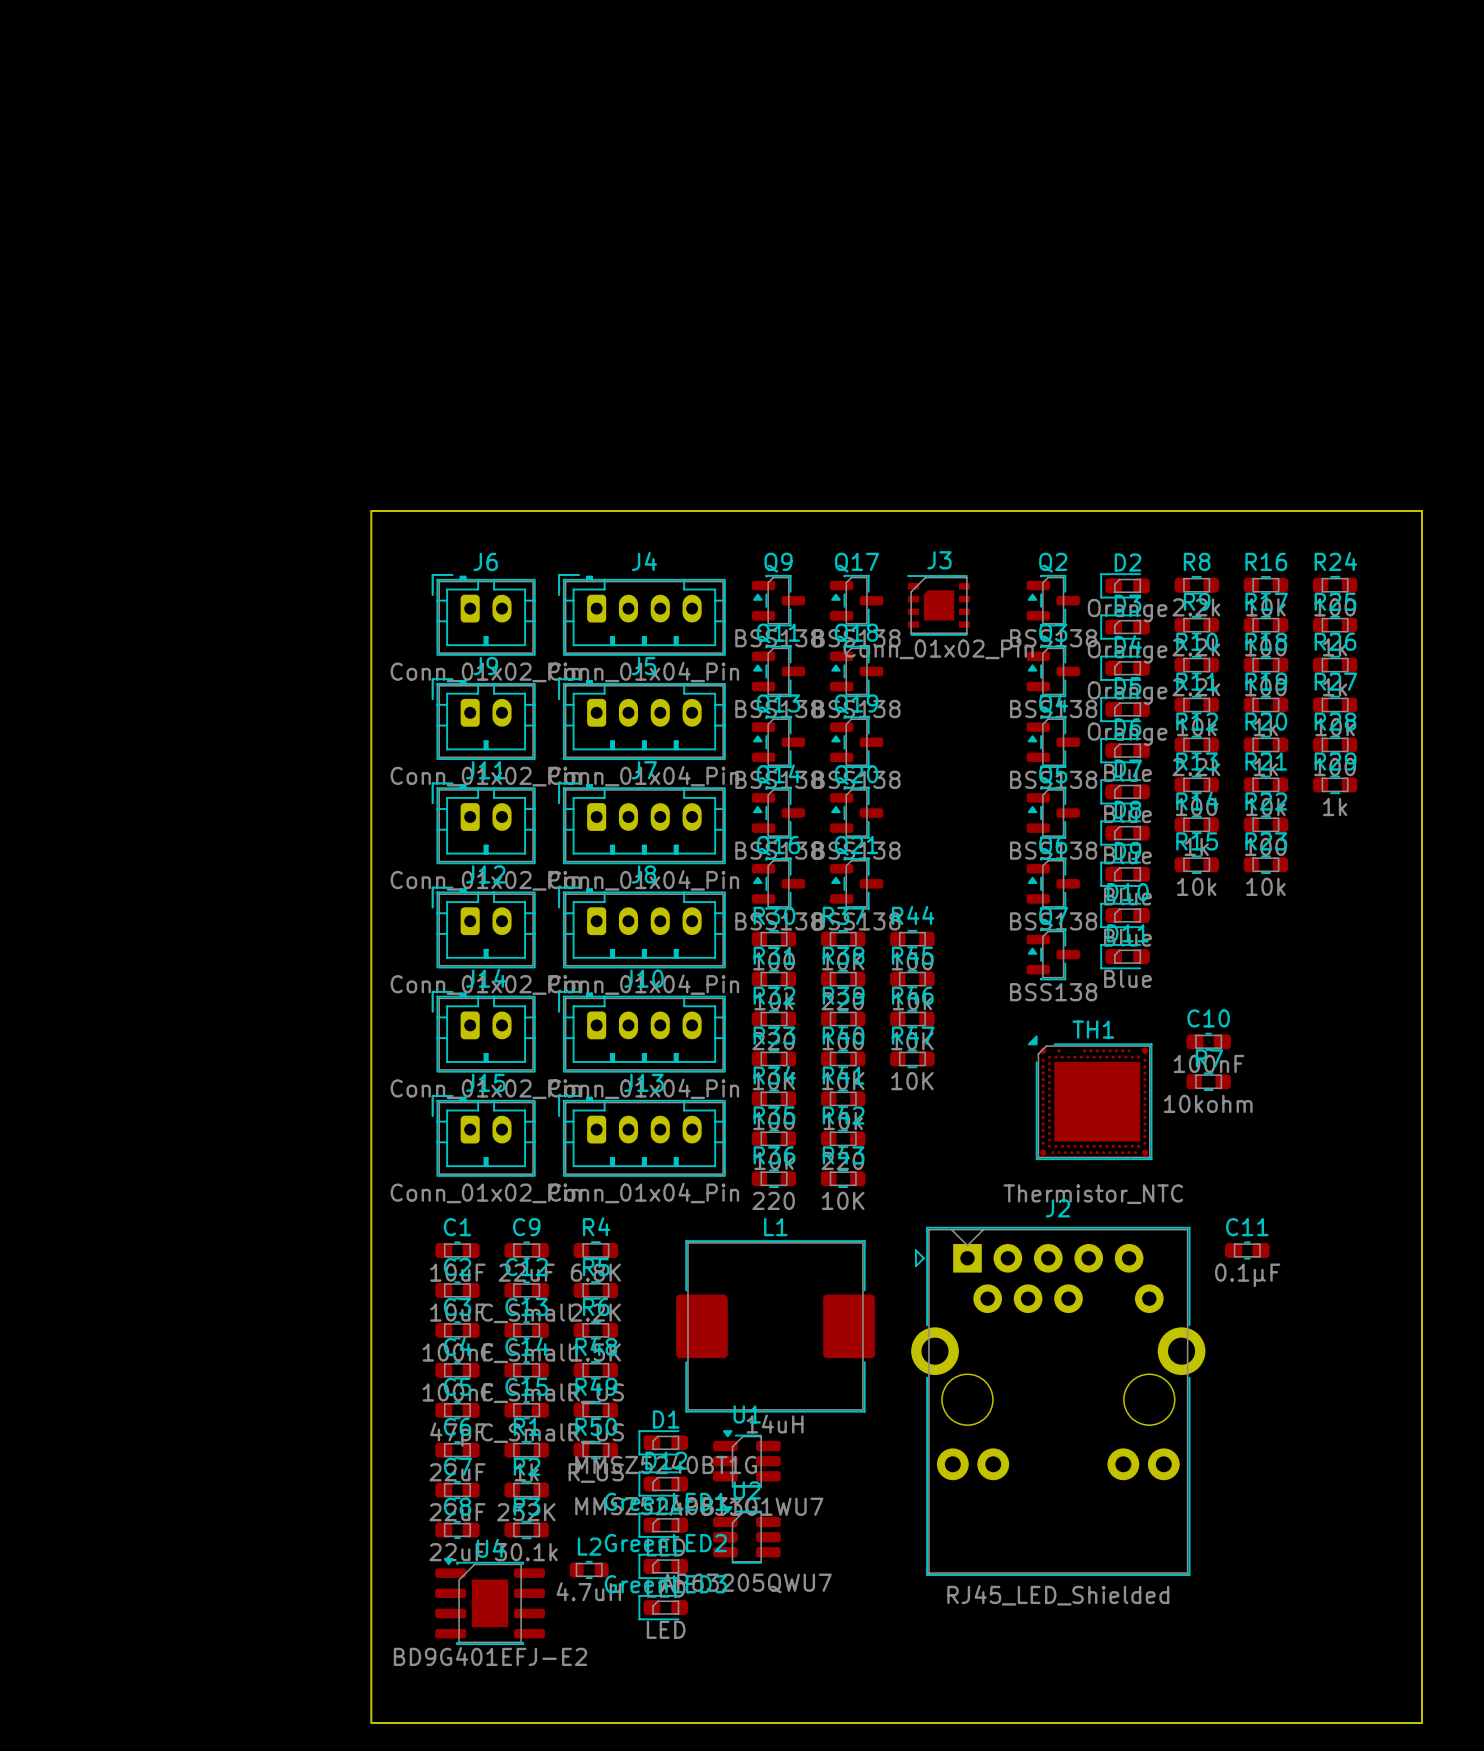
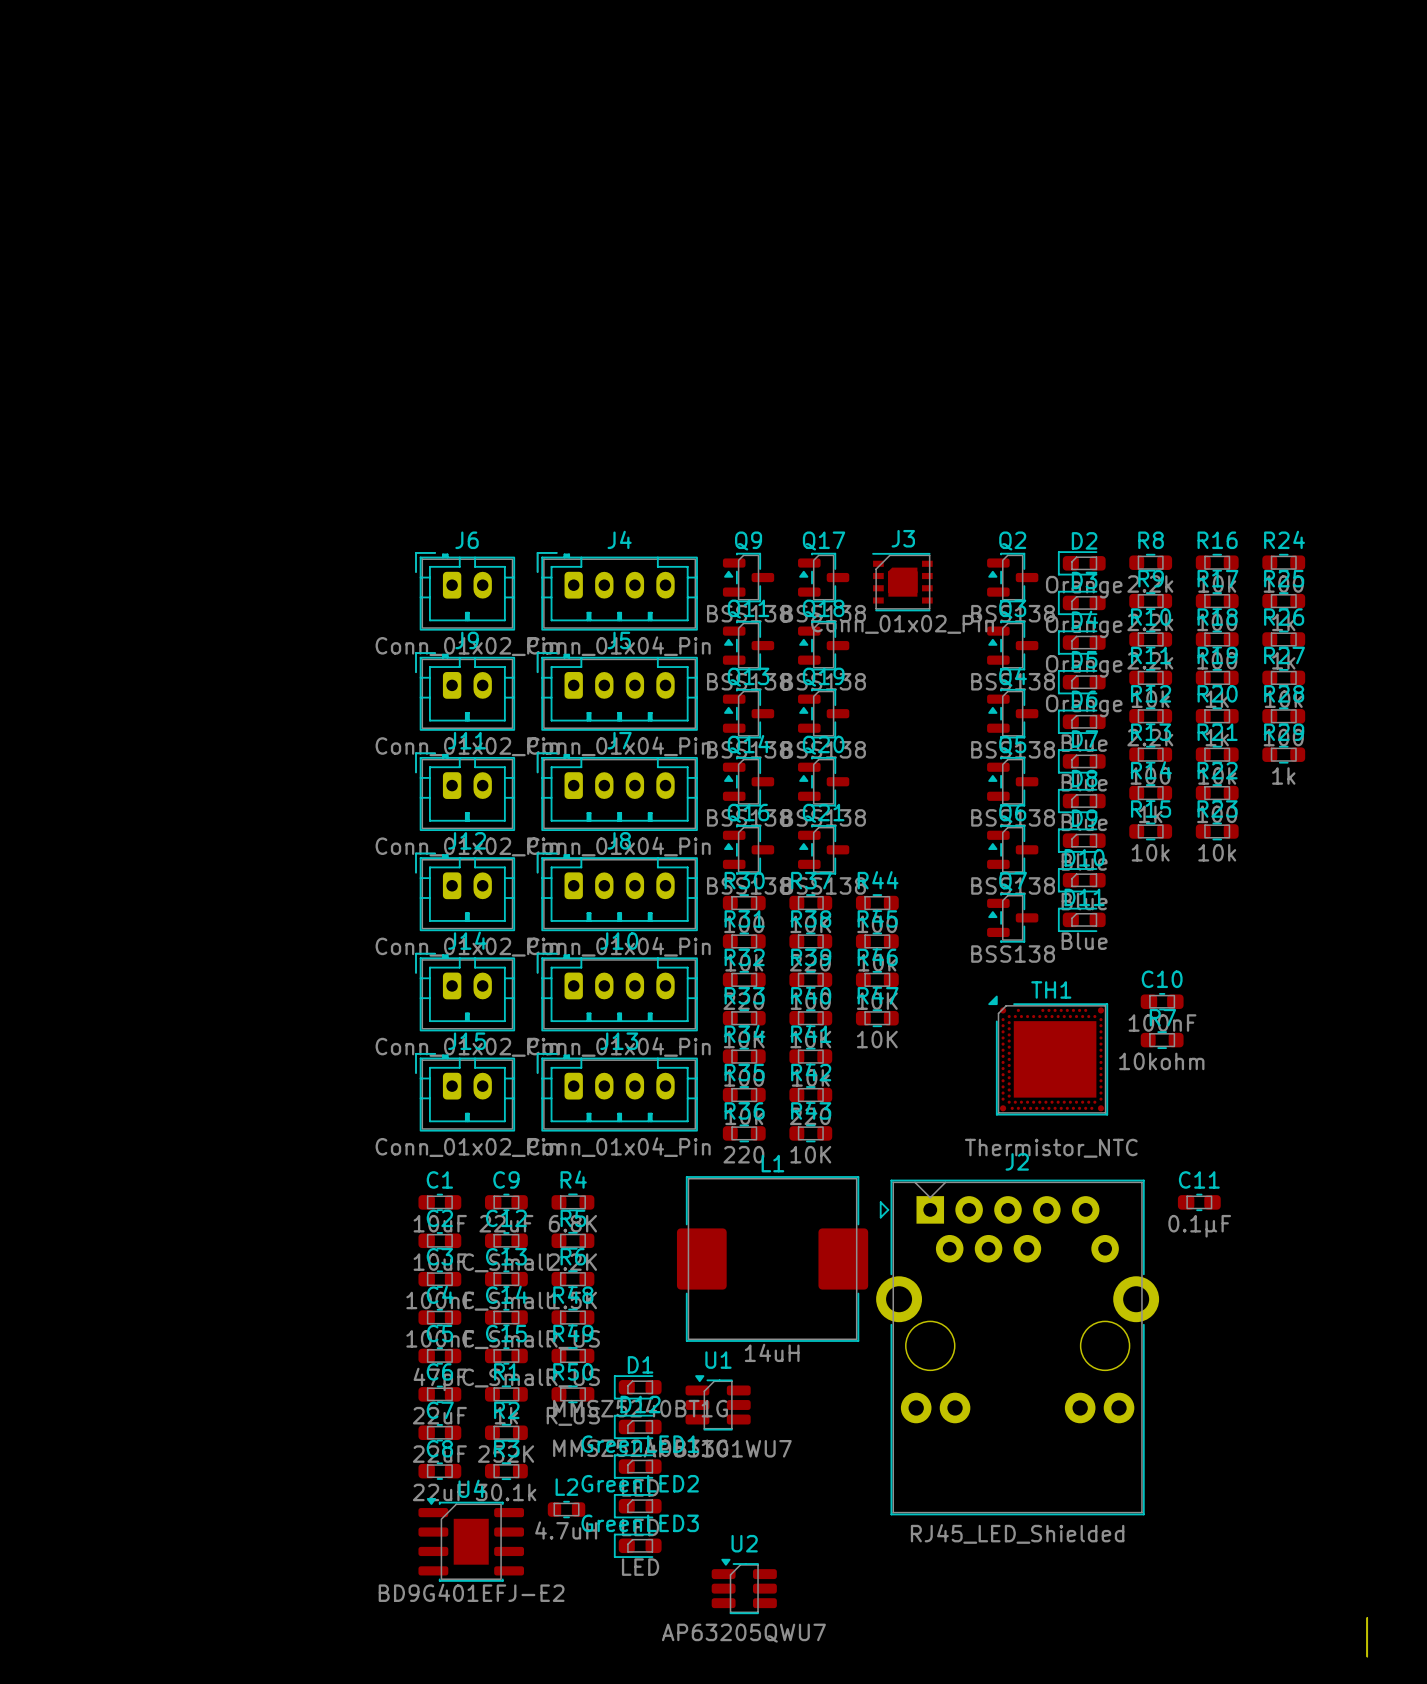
L1 position: (775, 1326) -> (772, 1258)
U2 position: (746, 1534) -> (744, 1586)
board edge: (1421, 1682) (1421, 510) (371, 510) (371, 1722) (1421, 1722) -> none

